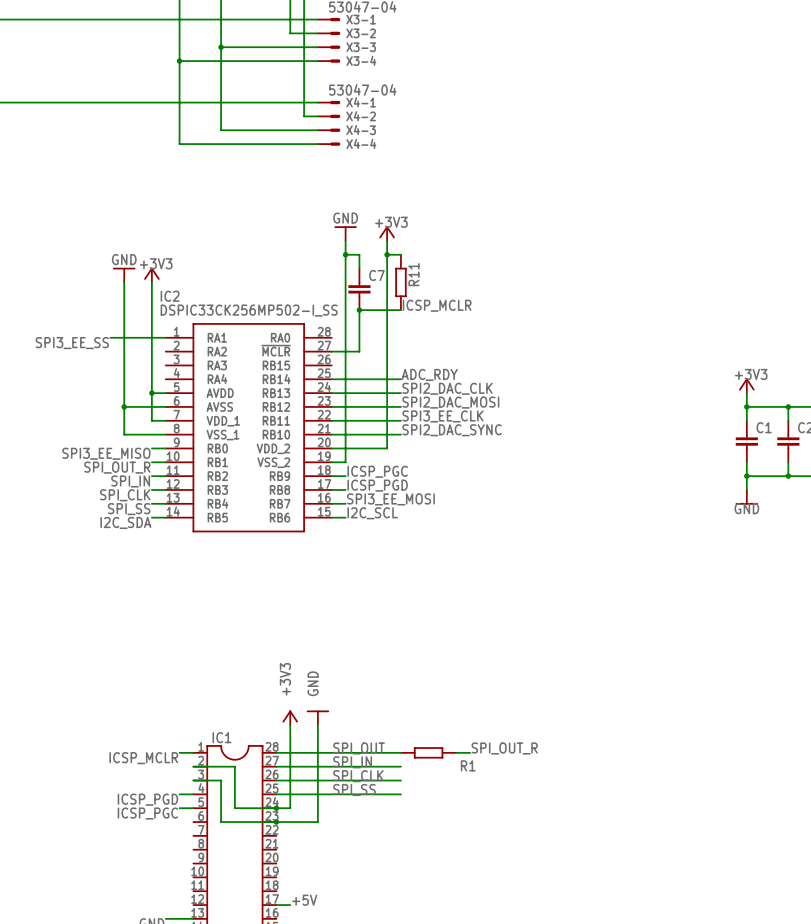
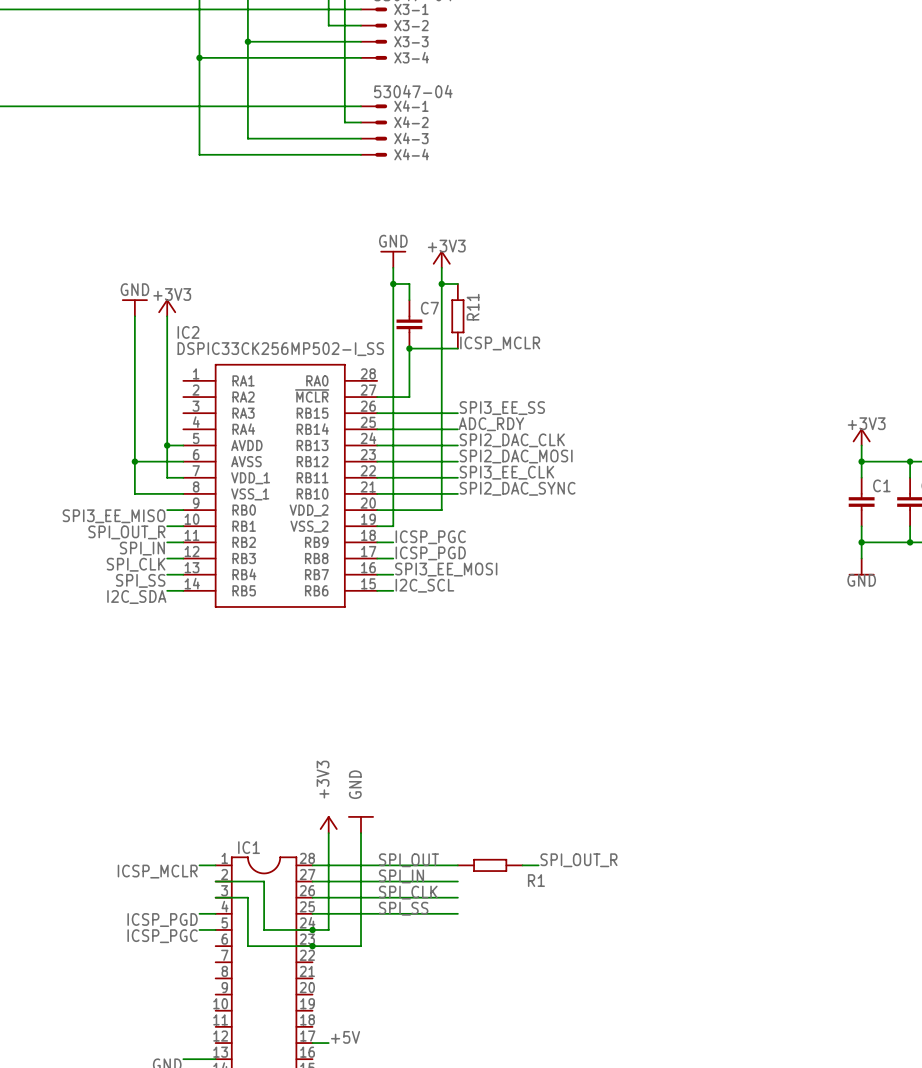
wire: (110, 337) (165, 337) -> none
label: SPI3_EE_SS (72, 343) -> none
label: none -> SPI3_EE_SS (502, 408)
wire: none -> (377, 413) (457, 413)

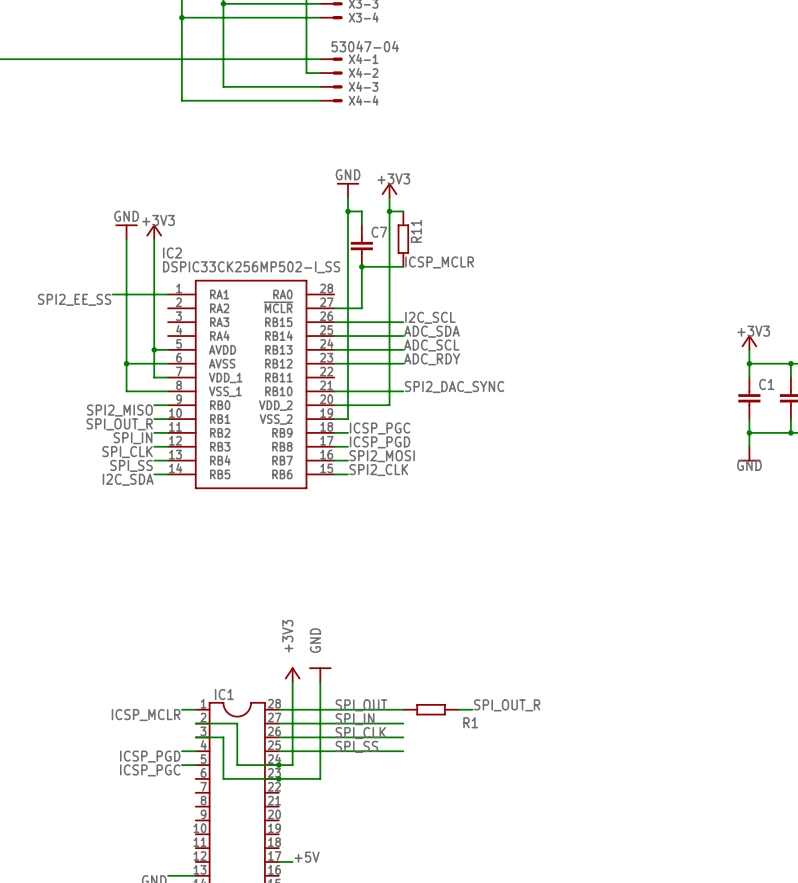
wire: none -> (112, 294) (168, 294)
label: none -> SPI2_EE_SS (74, 299)
label: SPI3_EE_SS (502, 408) -> I2C_SCL (430, 317)
label: ADC_RDY (491, 424) -> ADC_SDA (431, 331)
label: SPI2_DAC_CLK (512, 440) -> ADC_SCL (431, 345)
label: SPI2_DAC_MOSI (516, 456) -> ADC_RDY (432, 359)
label: SPI3_EE_CLK (506, 472) -> none
wire: (377, 477) (457, 477) -> none
label: SPI3_EE_MISO (114, 516) -> SPI2_MISO (119, 410)
label: SPI3_EE_MOSI (446, 569) -> SPI2_MOSI (382, 456)
label: I2C_SCL (424, 585) -> SPI2_CLK (378, 470)

